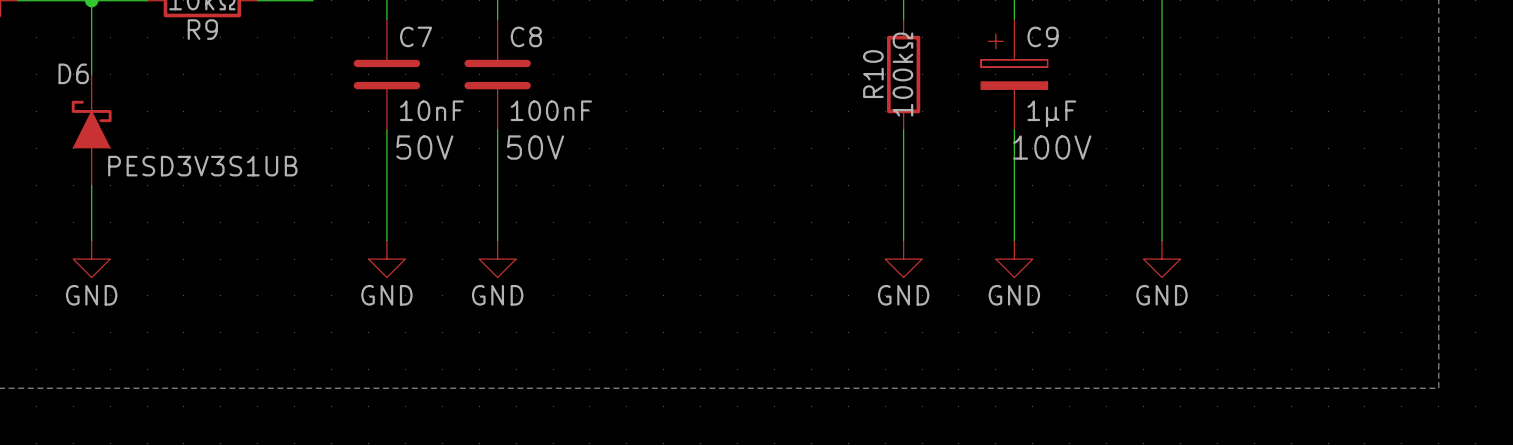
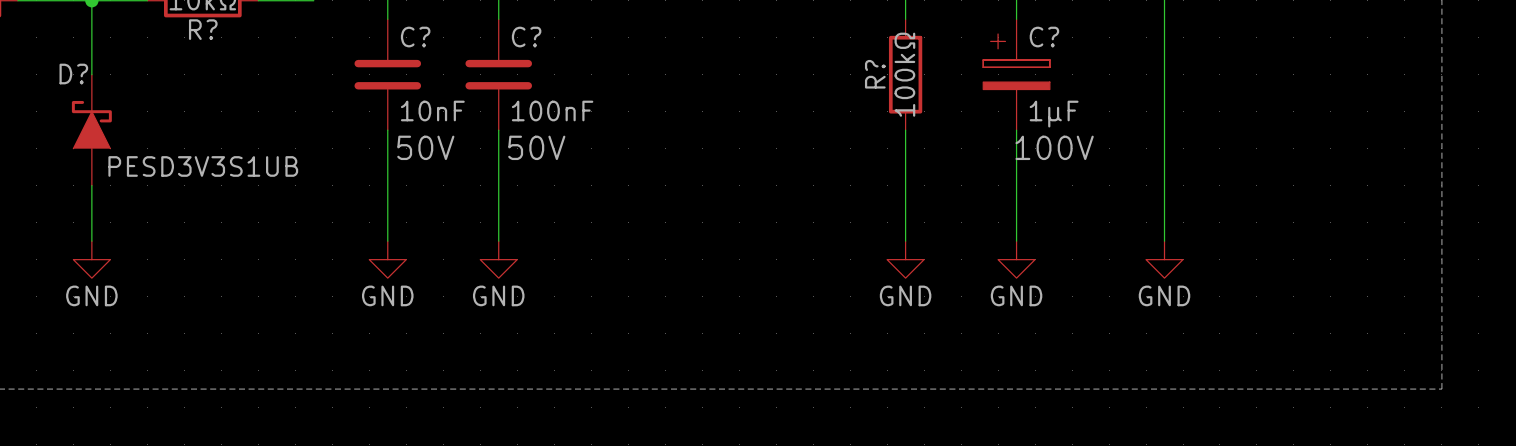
R9 name: R9 (202, 29) -> R? (203, 29)
C7 name: C7 (416, 36) -> C? (415, 37)
C8 name: C8 (526, 36) -> C? (526, 37)
C9 name: C9 (1043, 36) -> C? (1044, 37)
D6 name: D6 (73, 73) -> D? (73, 74)
R10 name: R10 (873, 74) -> R? (875, 74)

